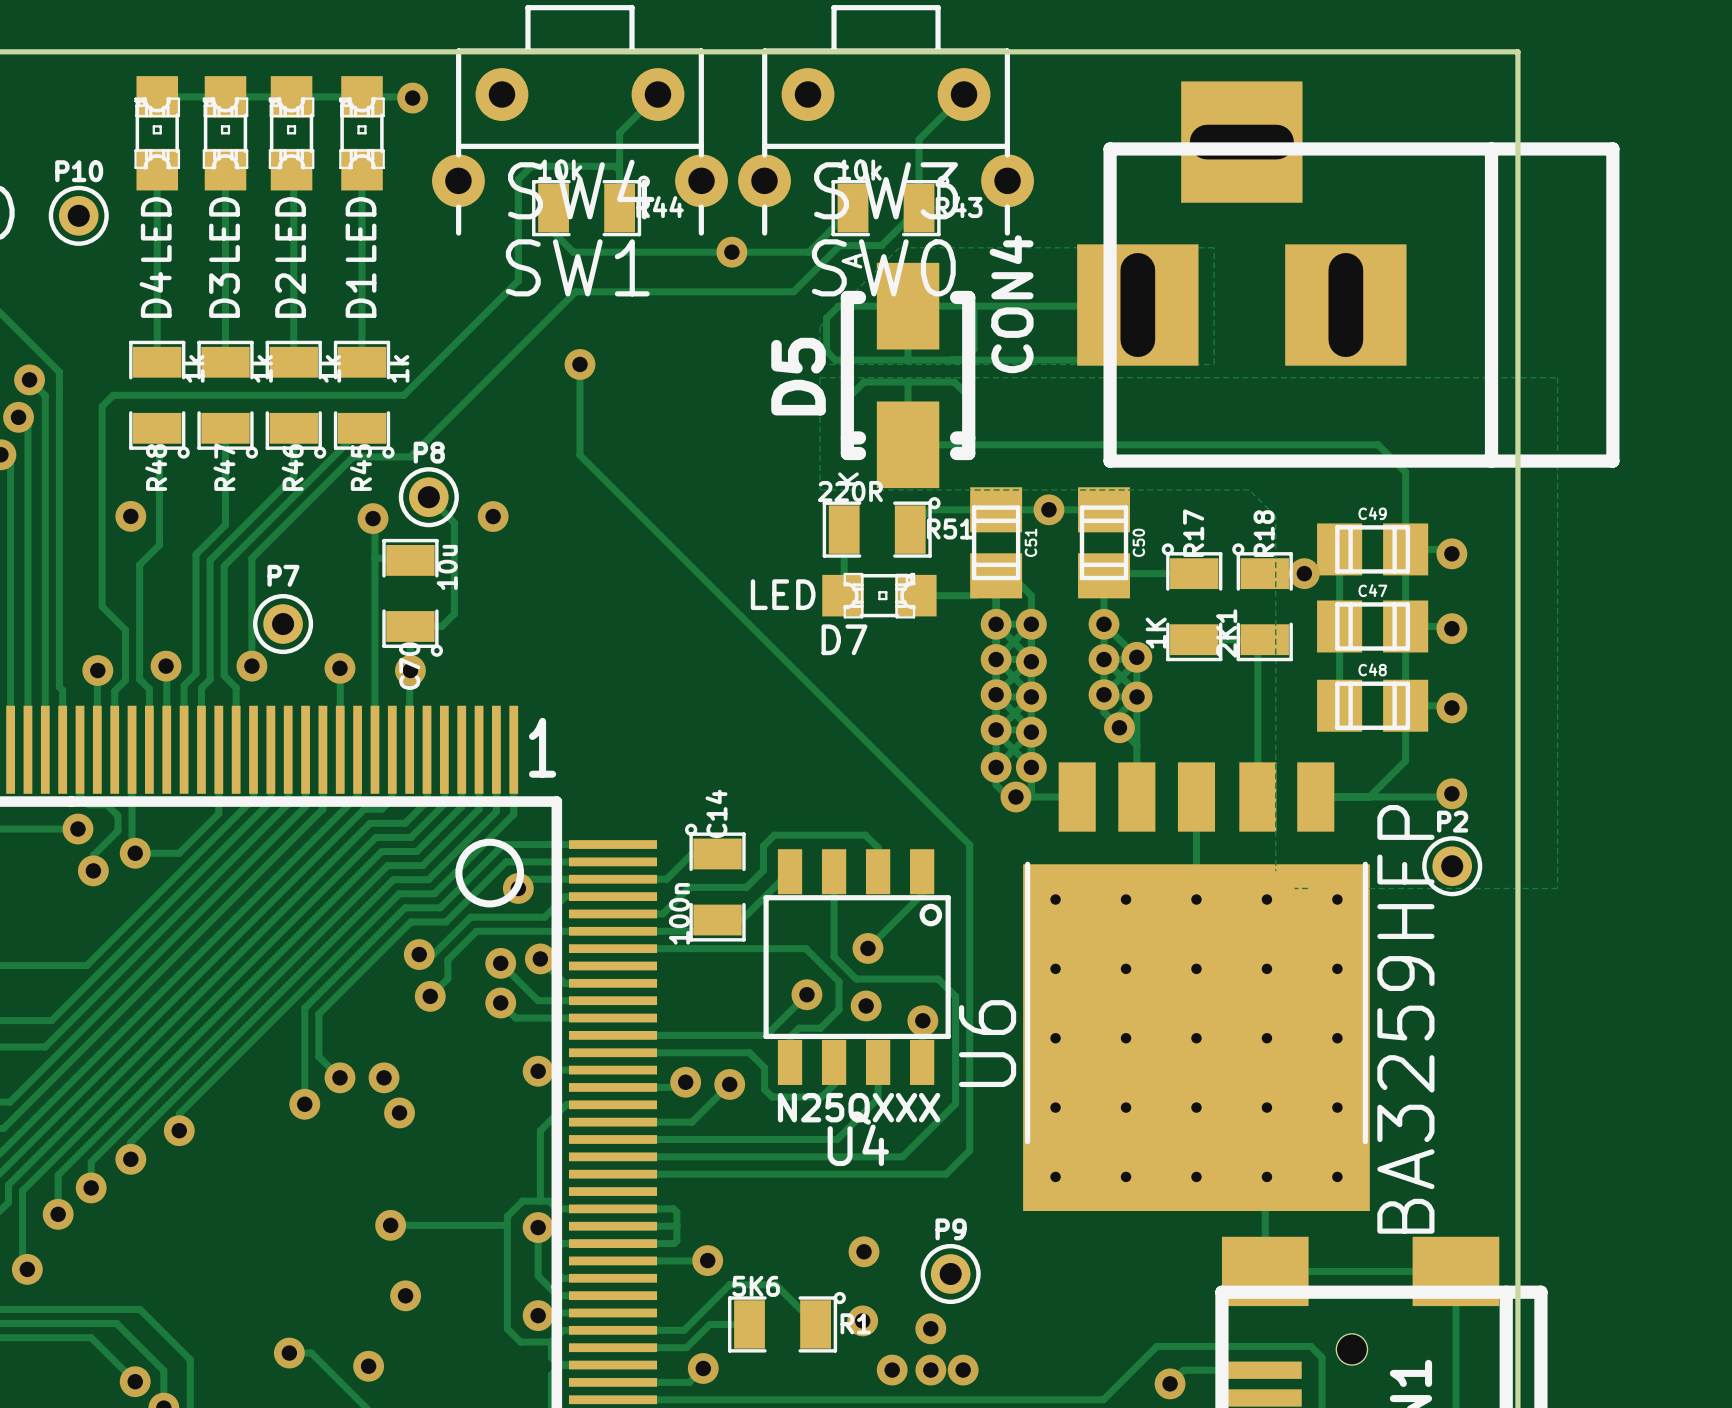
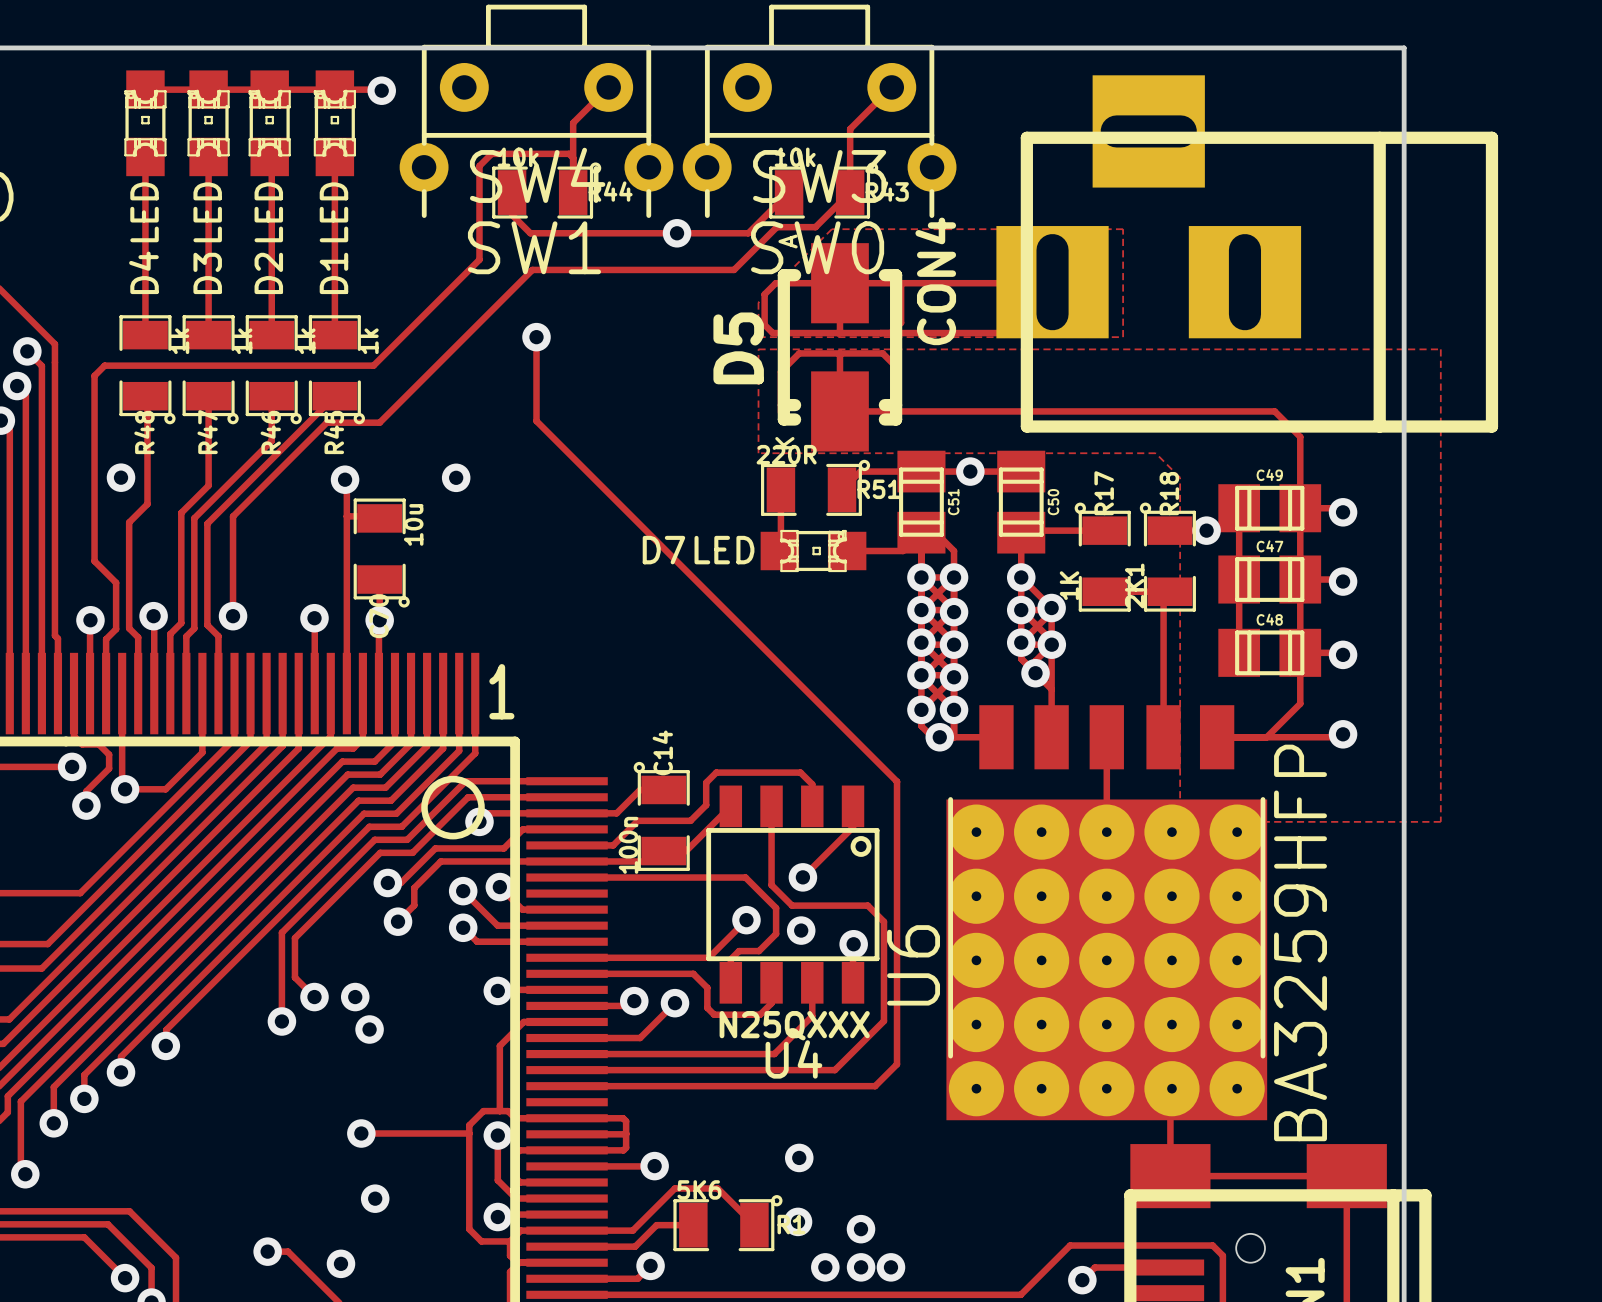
P10: (78, 215) -> none
track: (428, 497) (454, 522) (454, 613) (441, 626) (410, 626) -> none
P8: (428, 497) -> none
P7: (283, 624) -> none
D7 name position: D7 (844, 639) -> D7 (663, 550)
P2: (1452, 866) -> none
P9: (950, 1273) -> none

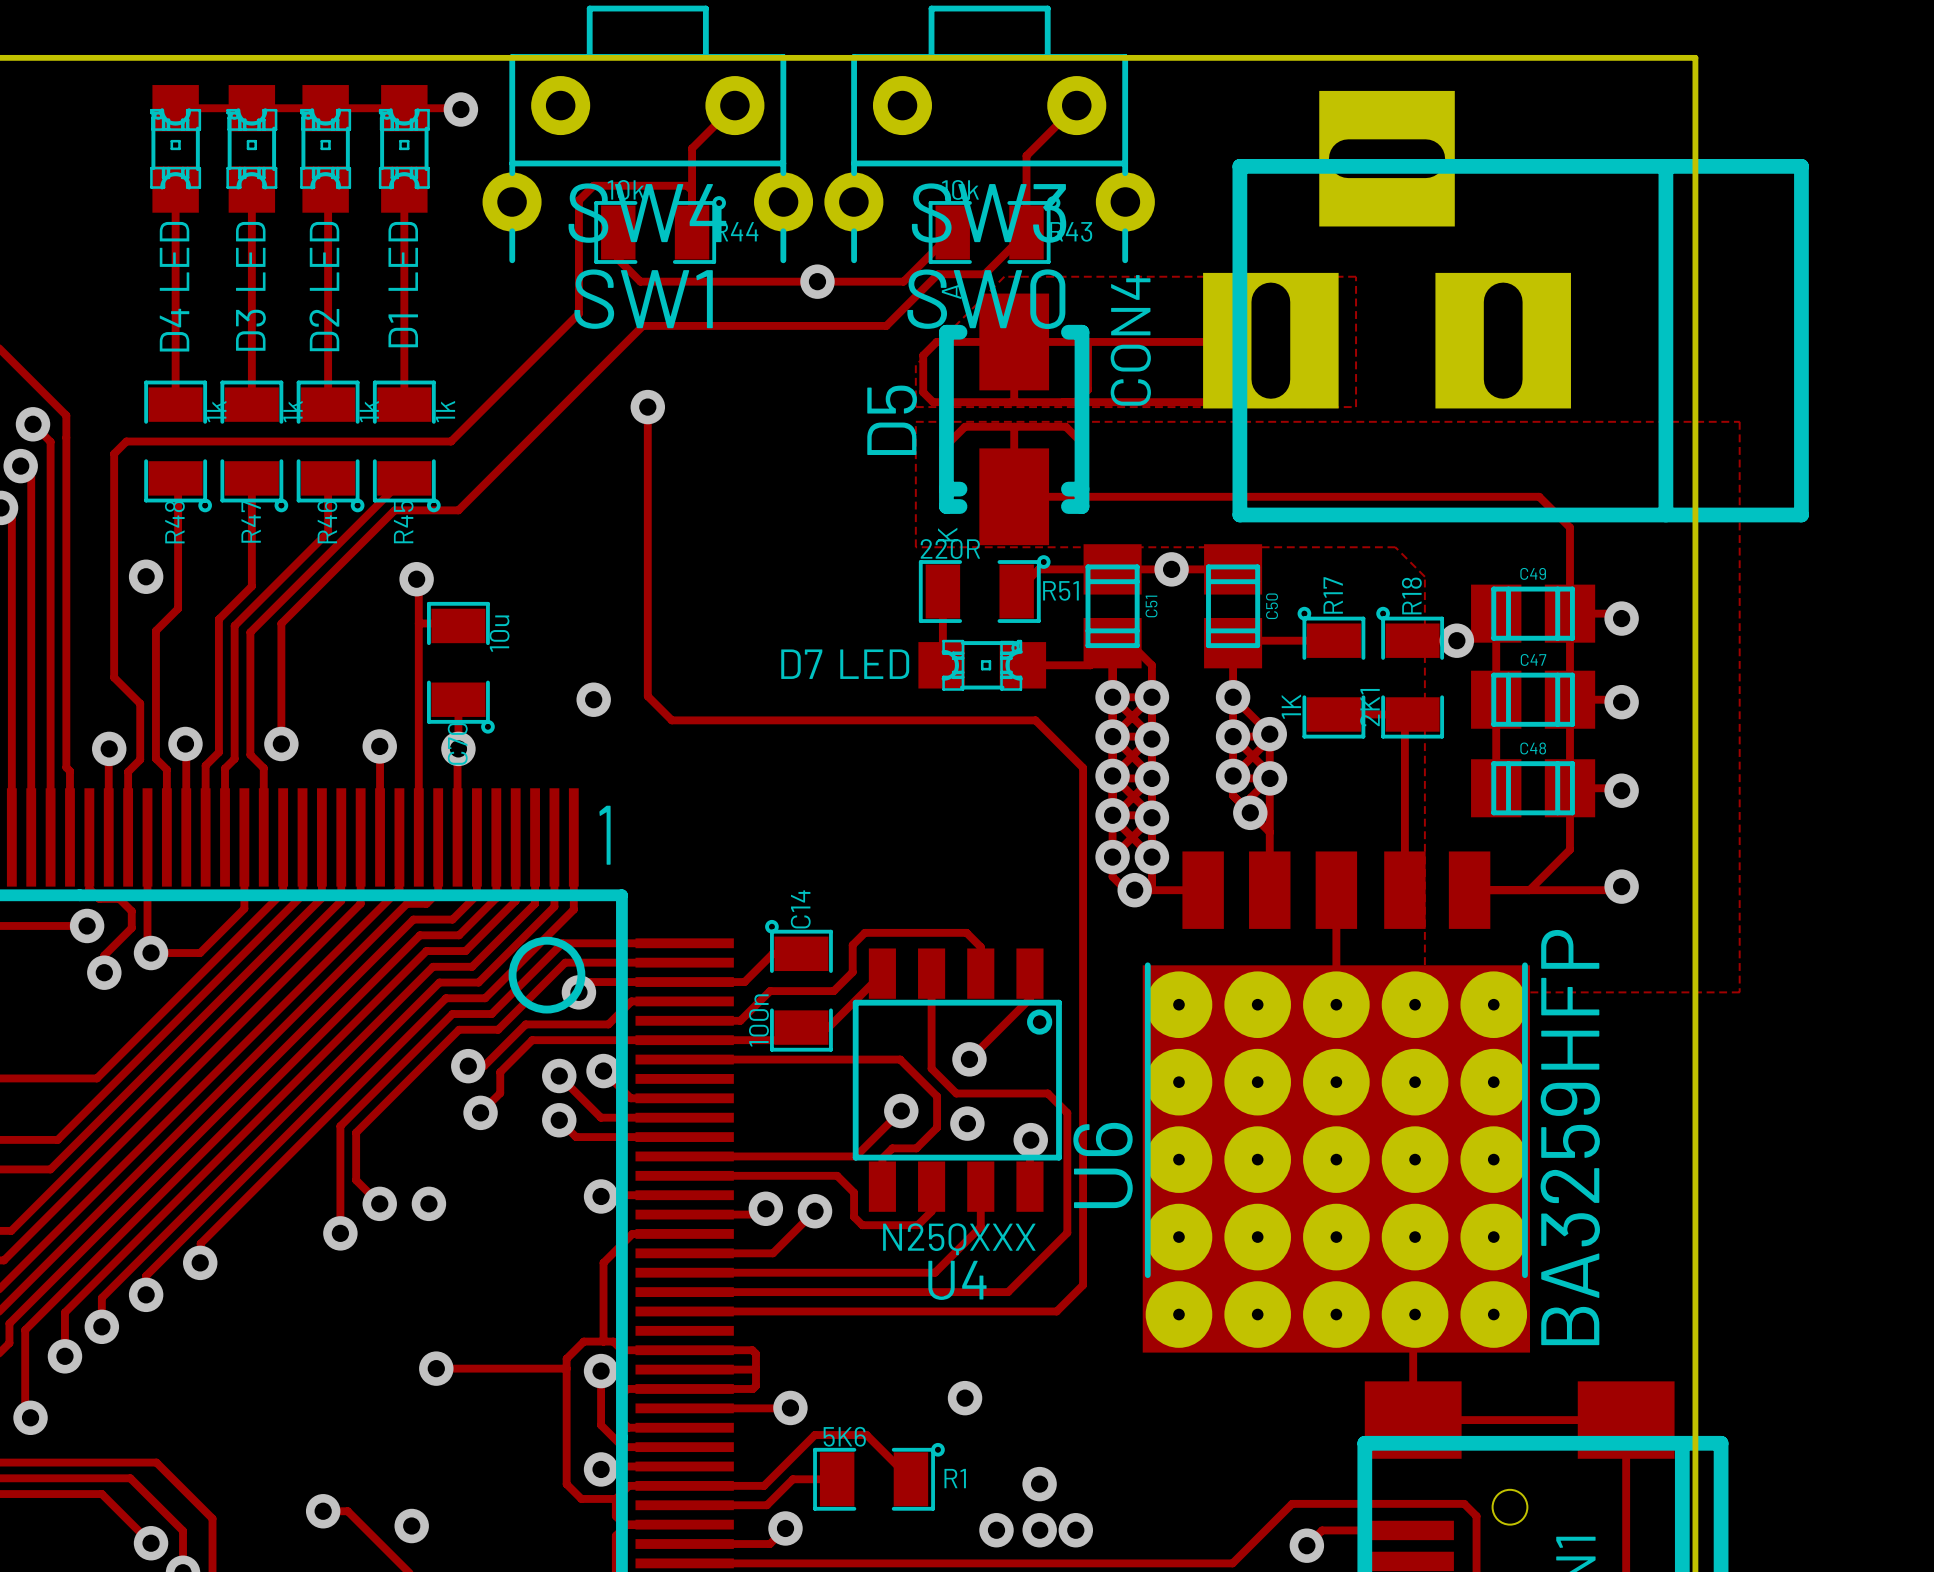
track: (536, 421) (897, 781) -> (647, 508) (647, 696) (671, 720) (1035, 720) (1083, 767) (1083, 943)
via position: (456, 477) -> (593, 699)
via: (369, 1029) -> none
via: (375, 1198) -> none
via: (798, 1221) -> none

